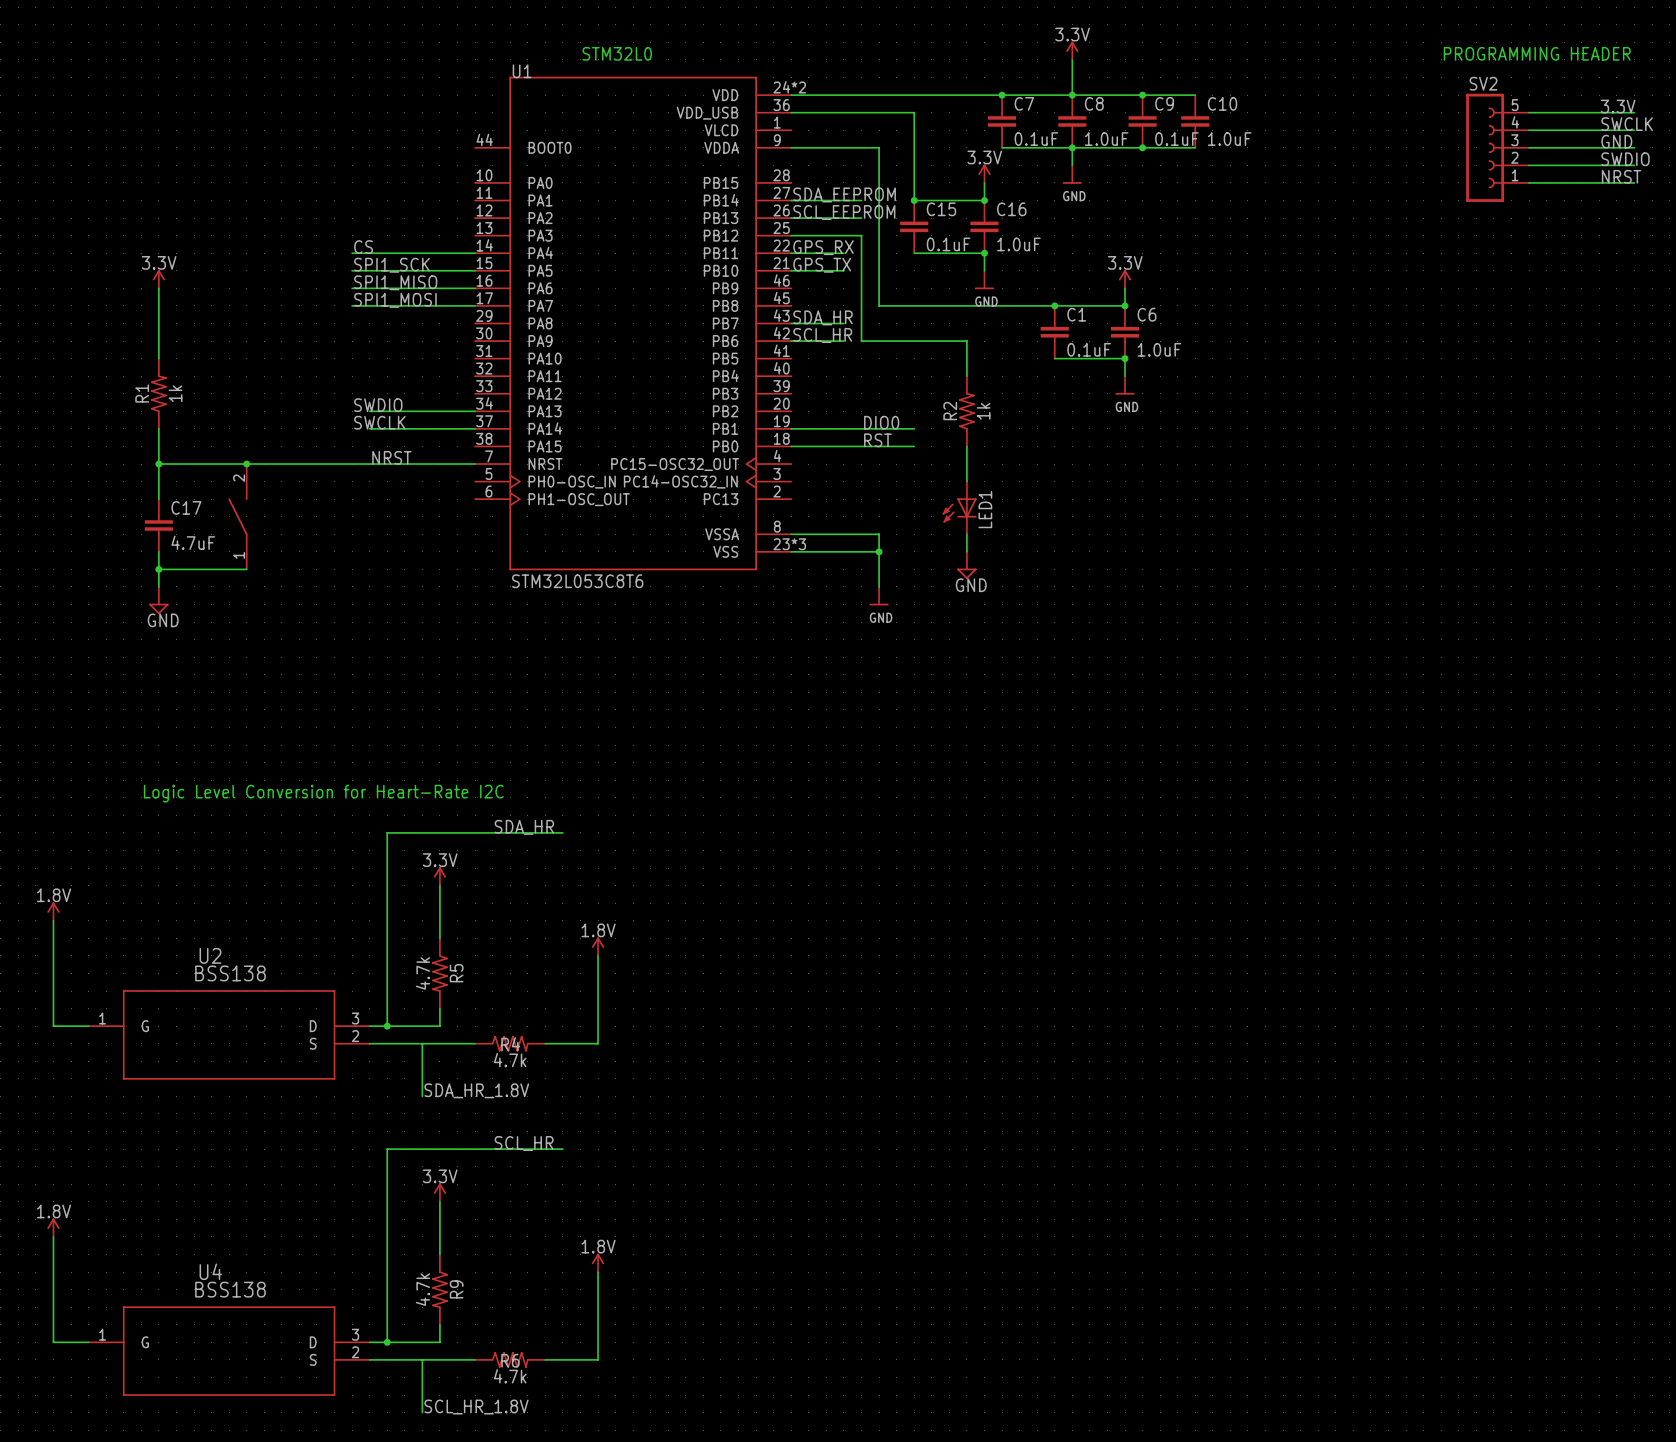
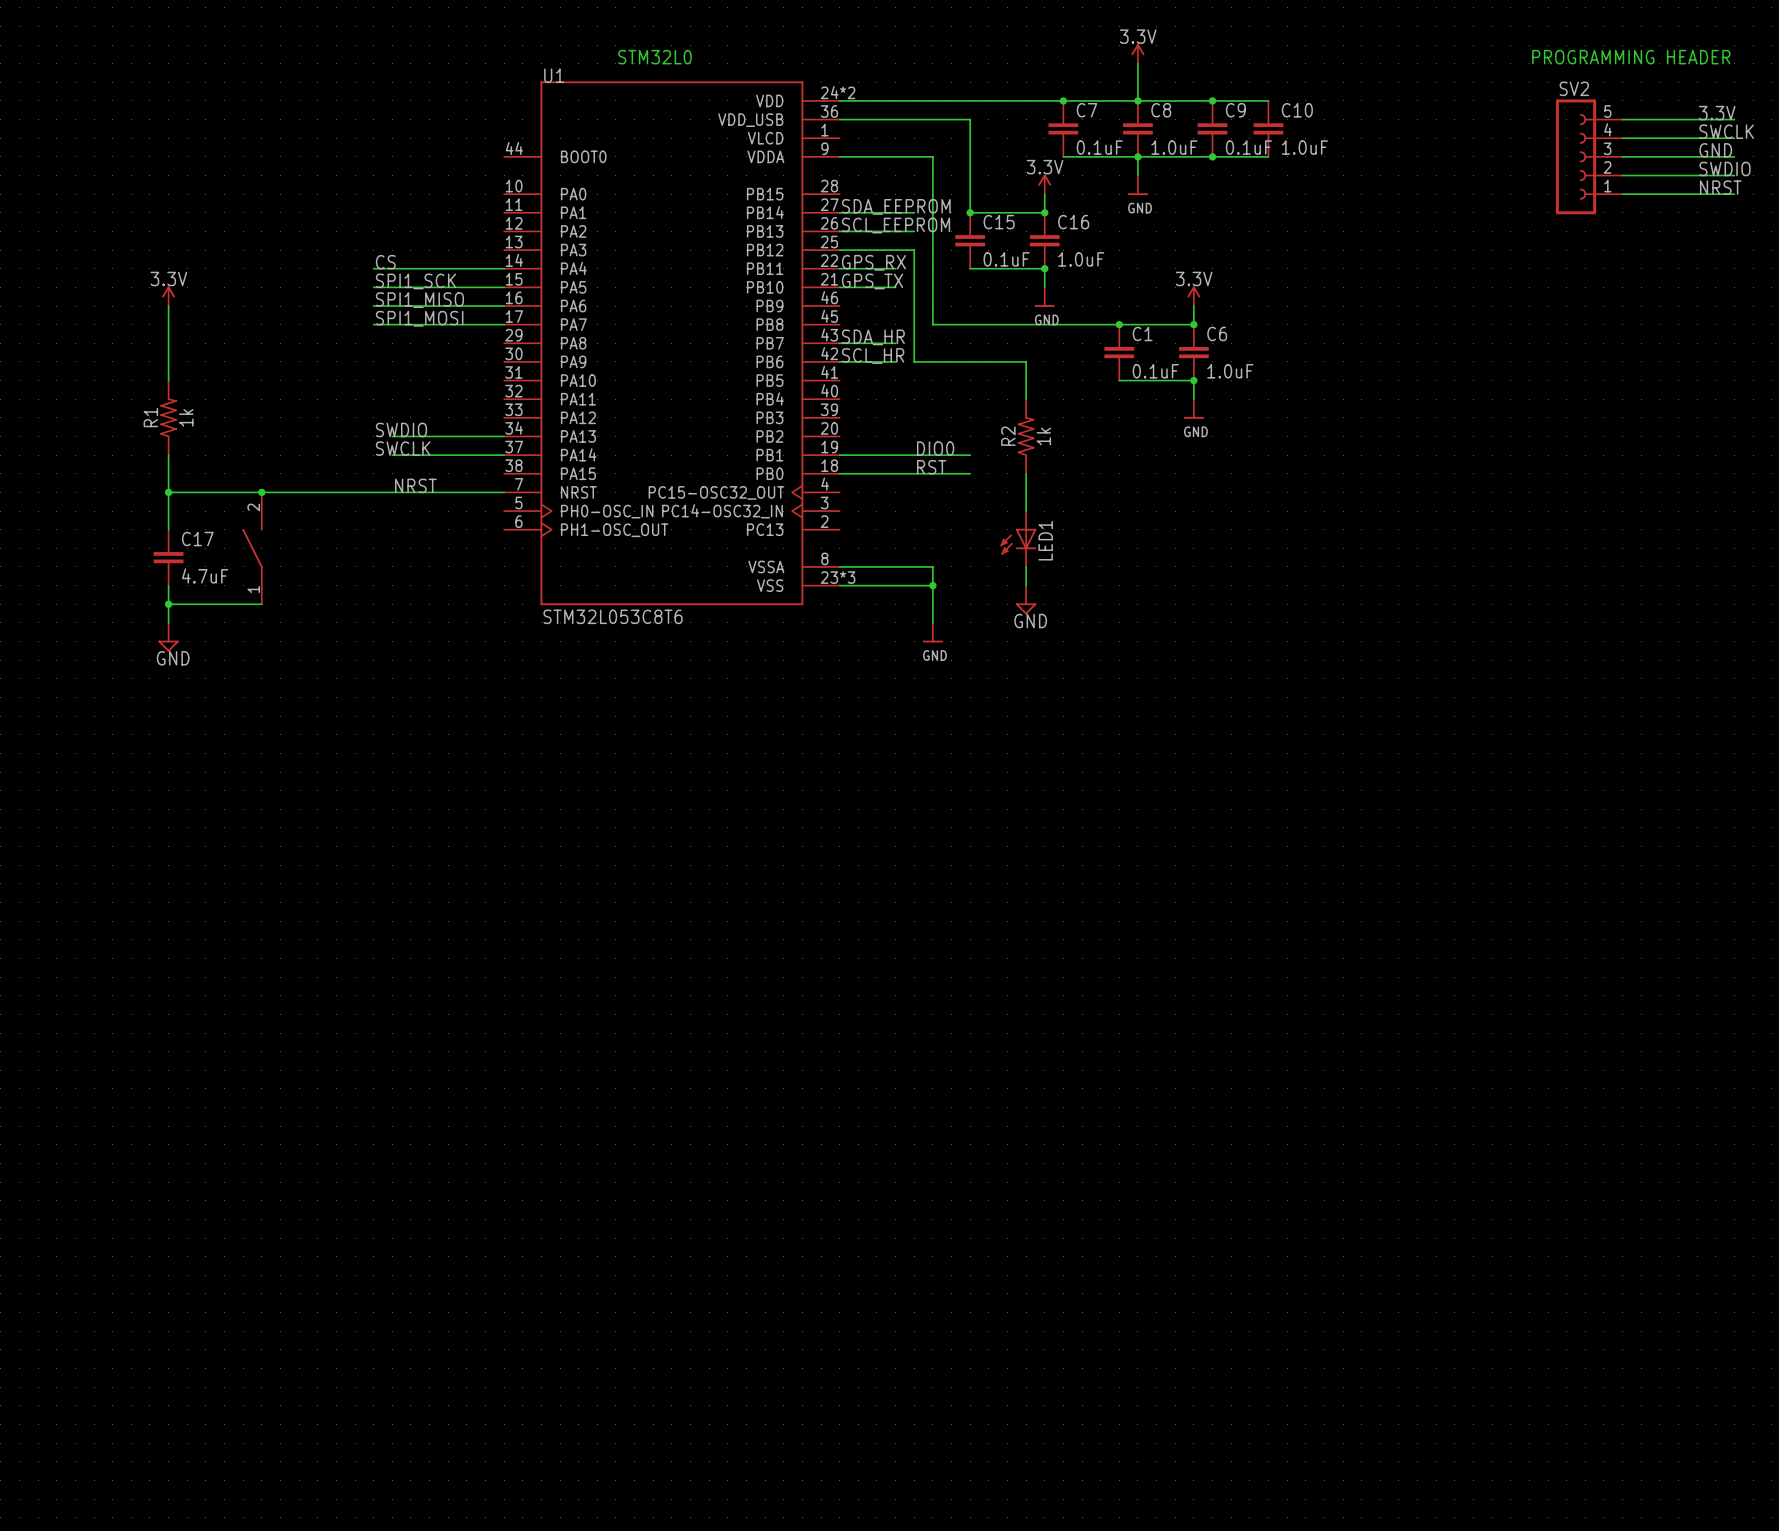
text: Logic Level Conversion for Heart-Rate I2C (323, 793) -> none
label: SDA_HR (524, 827) -> none
wire: (562, 832) (387, 832) (387, 1026) -> none
power symbol: 3.3V (439, 876) -> none
wire: (439, 885) (439, 938) -> none
power symbol: 1.8V (53, 911) -> none
wire: (53, 920) (53, 1026) (88, 1026) -> none
power symbol: 1.8V (598, 946) -> none
wire: (598, 955) (598, 1043) (545, 1043) -> none
R5: 4.7k (439, 973) -> none
wire: (439, 1008) (439, 1026) (369, 1026) -> none
junction: (387, 1026) -> none
U2: BSS138 (229, 1034) -> none
wire: (369, 1043) (475, 1043) -> none
wire: (422, 1043) (422, 1096) -> none
R4: 4.7k (510, 1043) -> none
label: SDA_HR_1.8V (476, 1090) -> none
label: SCL_HR (524, 1143) -> none
wire: (562, 1149) (387, 1149) (387, 1342) -> none
power symbol: 3.3V (439, 1192) -> none
wire: (439, 1201) (439, 1254) -> none
power symbol: 1.8V (53, 1227) -> none
wire: (53, 1236) (53, 1342) (88, 1342) -> none
power symbol: 1.8V (598, 1262) -> none
wire: (598, 1272) (598, 1359) (545, 1359) -> none
R9: 4.7k (439, 1289) -> none
wire: (439, 1324) (439, 1342) (369, 1342) -> none
junction: (387, 1342) -> none
U4: BSS138 (229, 1351) -> none
wire: (369, 1359) (475, 1359) -> none
wire: (422, 1359) (422, 1412) -> none
R6: 4.7k (510, 1359) -> none
label: SCL_HR_1.8V (476, 1407) -> none

